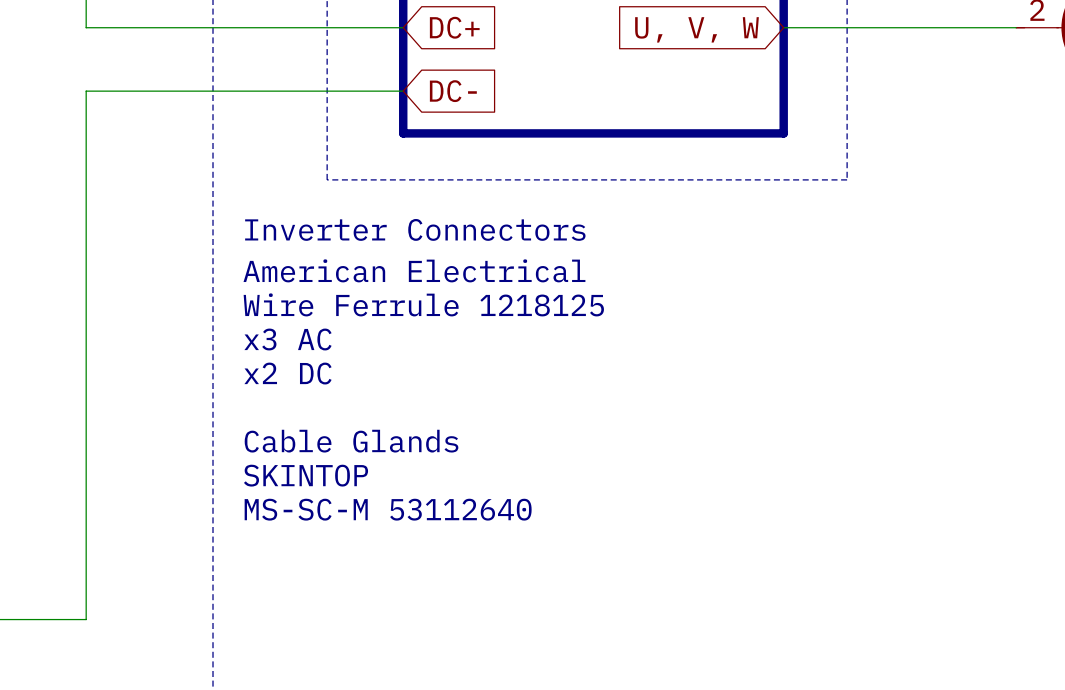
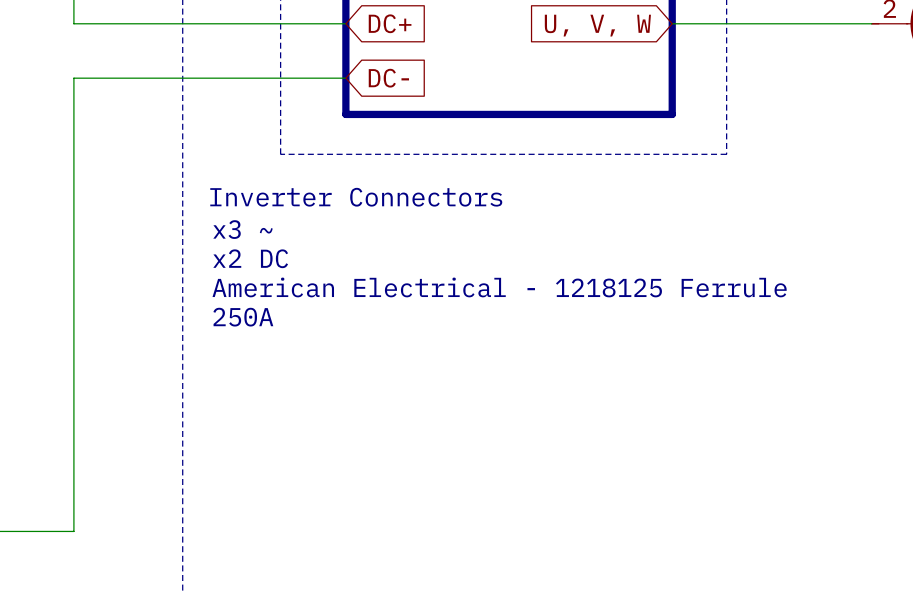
text: American Electrical (414, 270) -> x3 ~ (243, 229)
text: Wire Ferrule 1218125 (423, 304) -> none
text: x3 AC (288, 339) -> American Electrical - 1218125 Ferrule (499, 287)
text: none -> 250A (243, 317)
text position: x2 DC (288, 373) -> x2 DC (250, 258)
text: Cable Glands (351, 441) -> none
text: SKINTOP (306, 475) -> none
text: MS-SC-M 53112640 (388, 509) -> none

